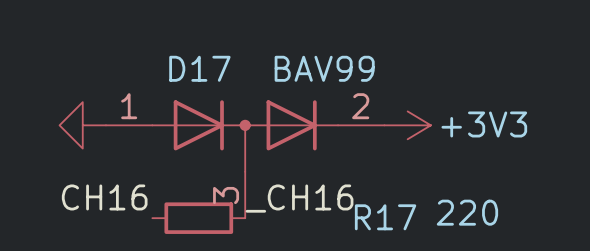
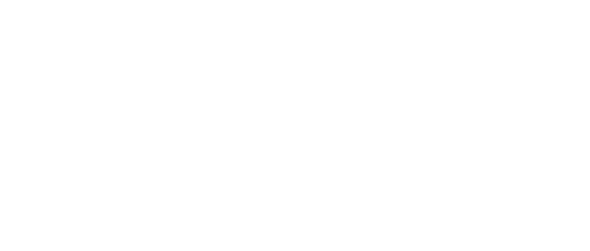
power symbol: (82, 125) -> none
power symbol: +3V3 (407, 125) -> none
D17: BAV99 (245, 159) -> none
label: CH16 (104, 197) -> none
label: _CH16 (299, 198) -> none
R17: 220 (198, 218) -> none

